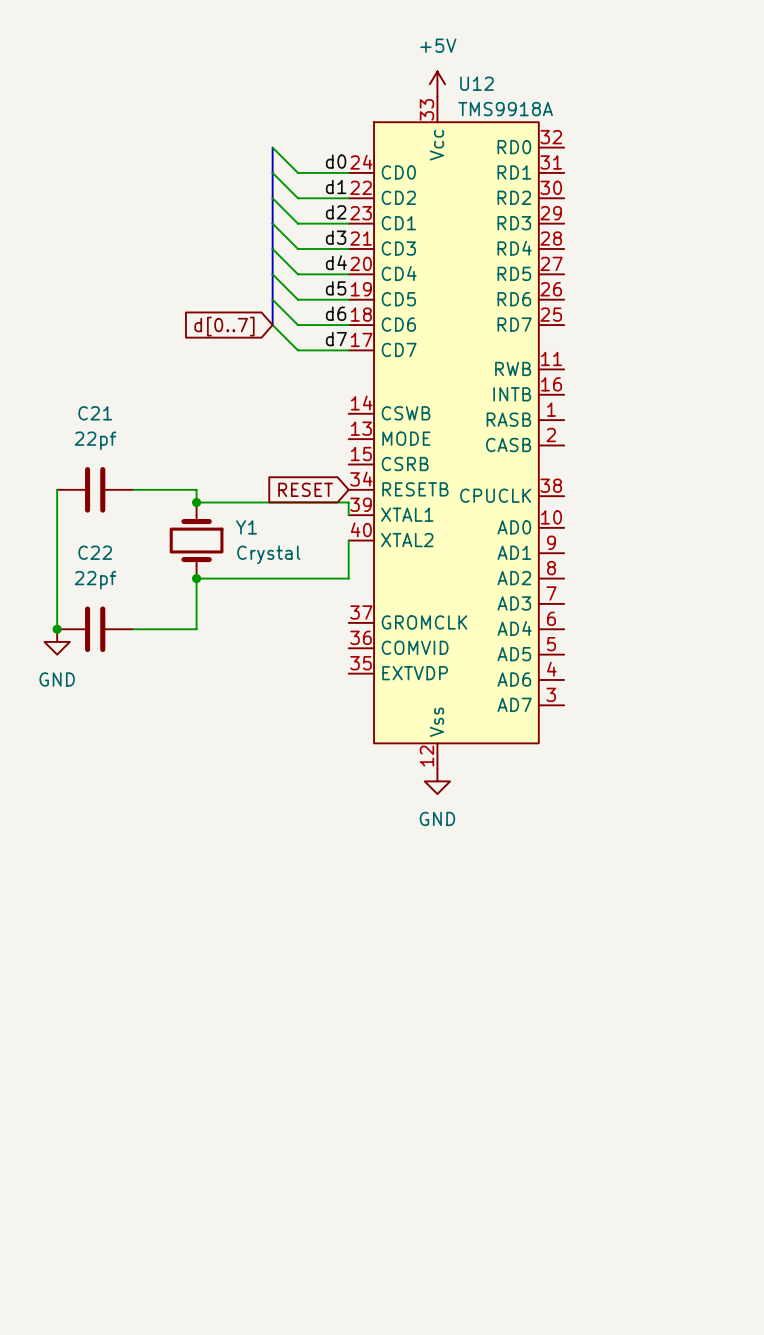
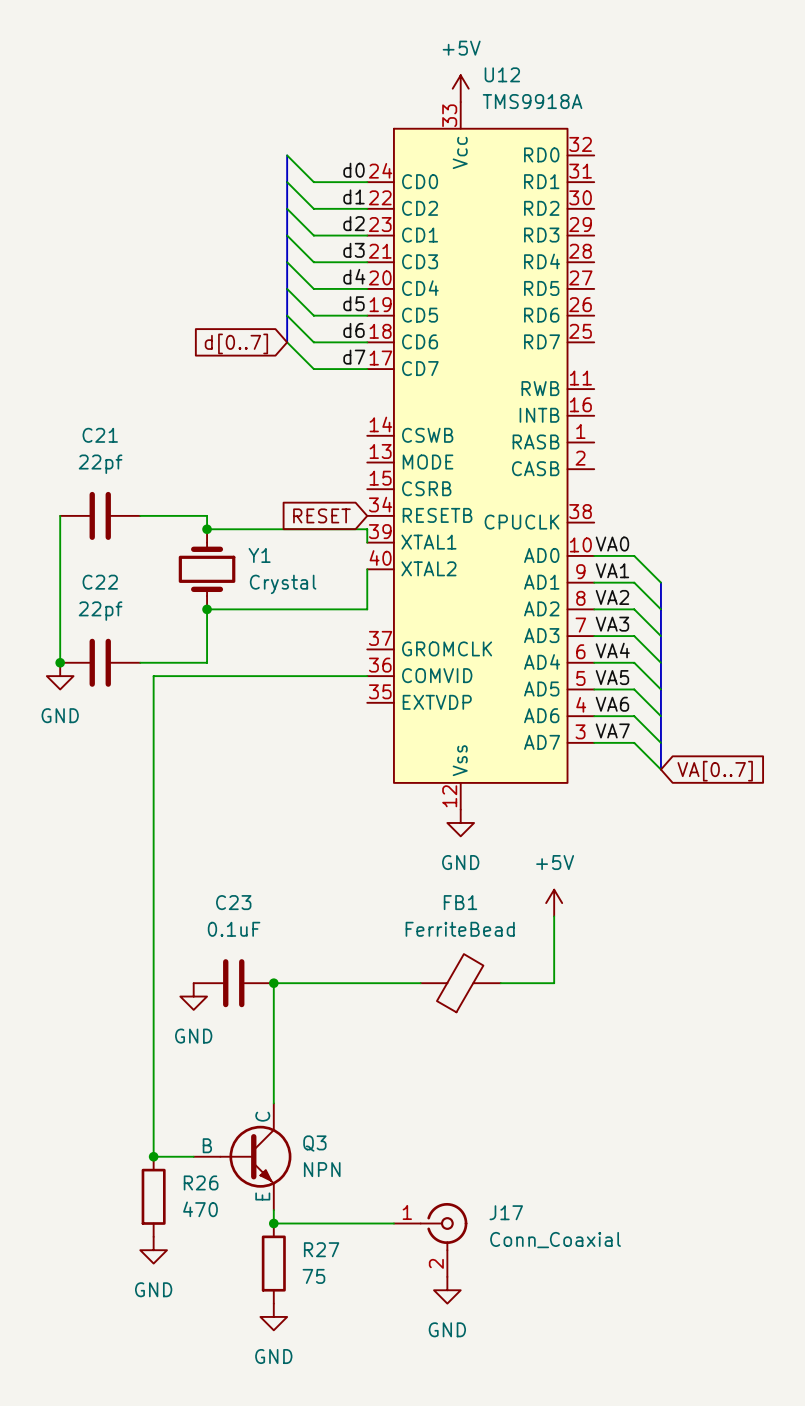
U12 symbol: [348, 96, 565, 769] -> [367, 102, 595, 810]
label: none -> VA0 (612, 544)
wire: none -> (594, 555) (634, 555) (660, 582)
label: none -> VA1 (612, 570)
wire: none -> (594, 582) (634, 582) (660, 609)
bus: none -> (660, 582) (660, 769)
label: none -> VA2 (612, 597)
wire: none -> (594, 609) (634, 609) (660, 636)
label: none -> VA3 (612, 624)
wire: none -> (594, 636) (634, 636) (660, 662)
label: none -> VA4 (612, 650)
wire: none -> (594, 662) (634, 662) (660, 689)
wire: none -> (367, 676) (153, 676) (153, 1156) (193, 1156)
label: none -> VA5 (612, 677)
wire: none -> (594, 689) (634, 689) (660, 716)
label: none -> VA6 (612, 704)
wire: none -> (594, 716) (634, 716) (660, 742)
label: none -> VA7 (612, 730)
wire: none -> (594, 742) (634, 742) (660, 769)
global label: none -> VA[0..7] (715, 771)
power symbol: none -> +5V (554, 903)
wire: none -> (554, 916) (554, 983) (500, 983)
C23: none -> 0.1uF (233, 983)
junction: none -> (273, 983)
wire: none -> (420, 983) (273, 983) (273, 1103)
FB1: none -> FerriteBead (460, 983)
power symbol: none -> GND (193, 996)
junction: none -> (153, 1156)
Q3: none -> NPN (242, 1156)
R26: none -> 470 (153, 1196)
wire: none -> (273, 1210) (273, 1223) (393, 1223)
junction: none -> (273, 1223)
J17: none -> Conn_Coaxial (430, 1239)
power symbol: none -> GND (153, 1250)
R27: none -> 75 (273, 1263)
power symbol: none -> GND (447, 1290)
power symbol: none -> GND (273, 1316)

